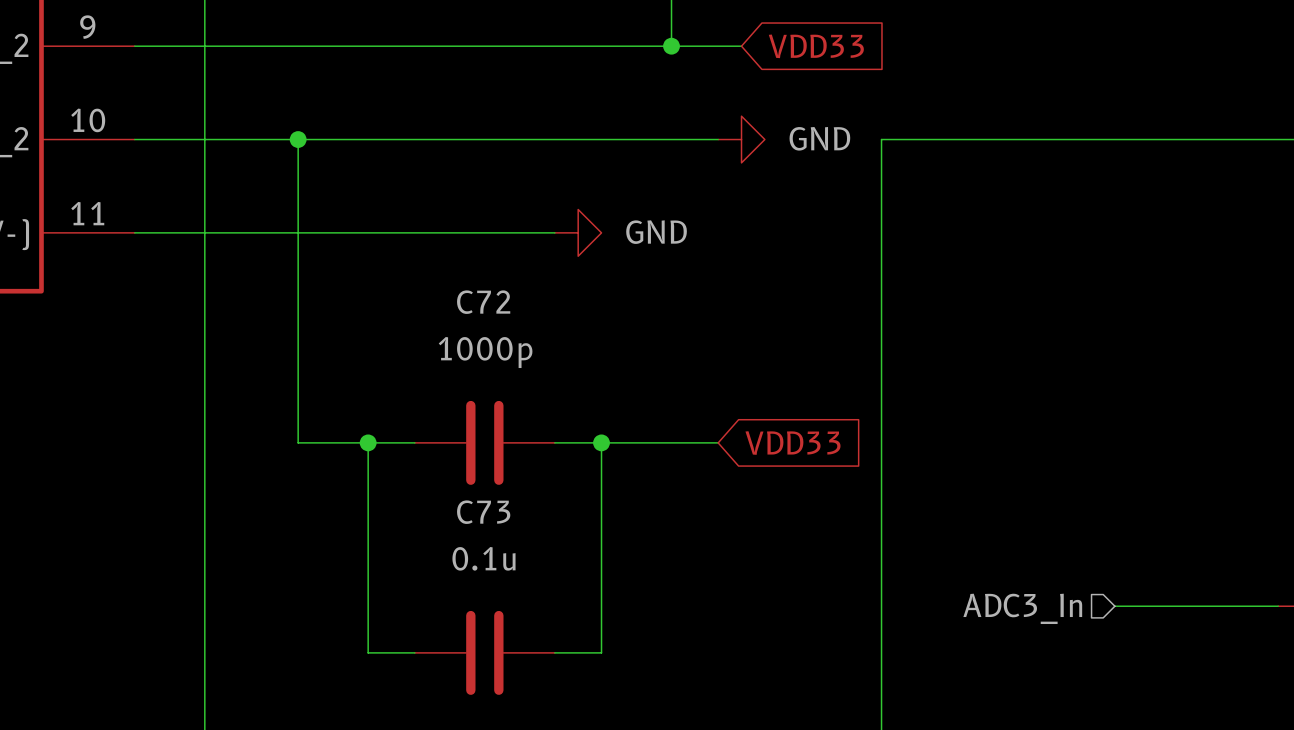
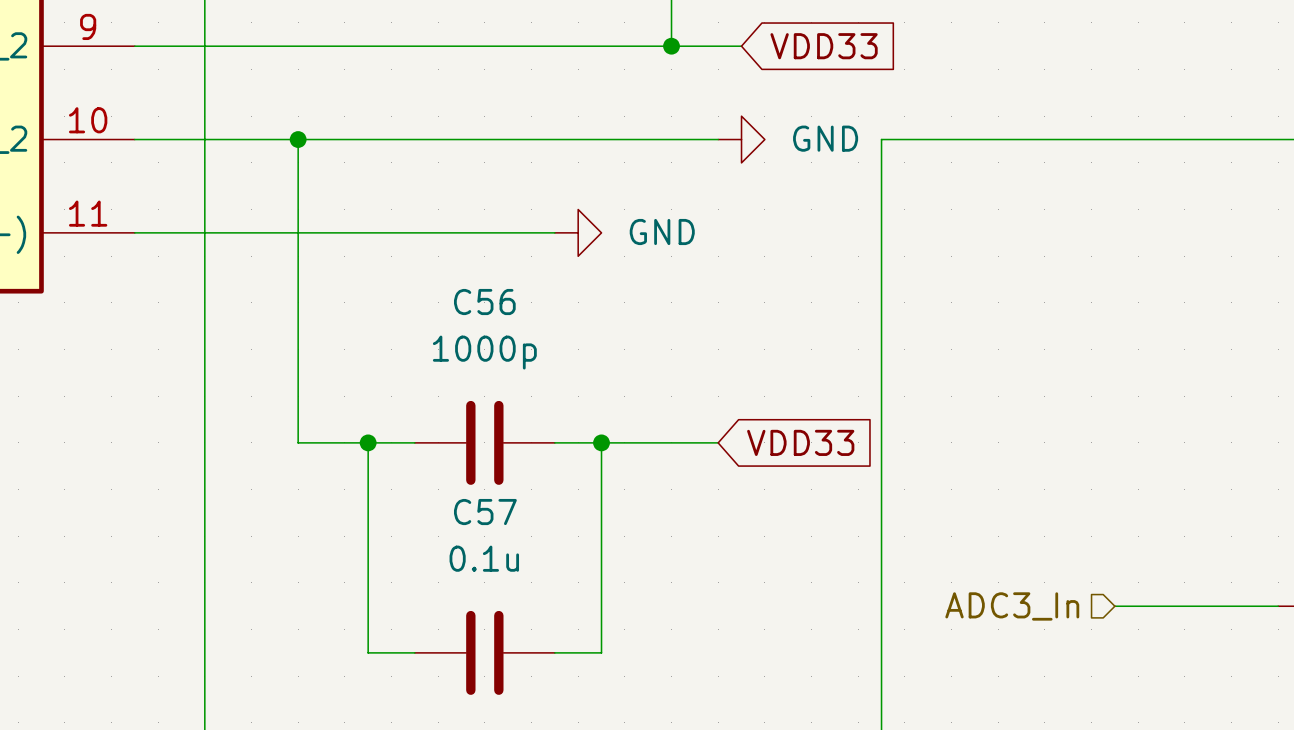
C72 name: C72 (483, 302) -> C56 (484, 302)
C73 name: C73 (483, 512) -> C57 (485, 512)

